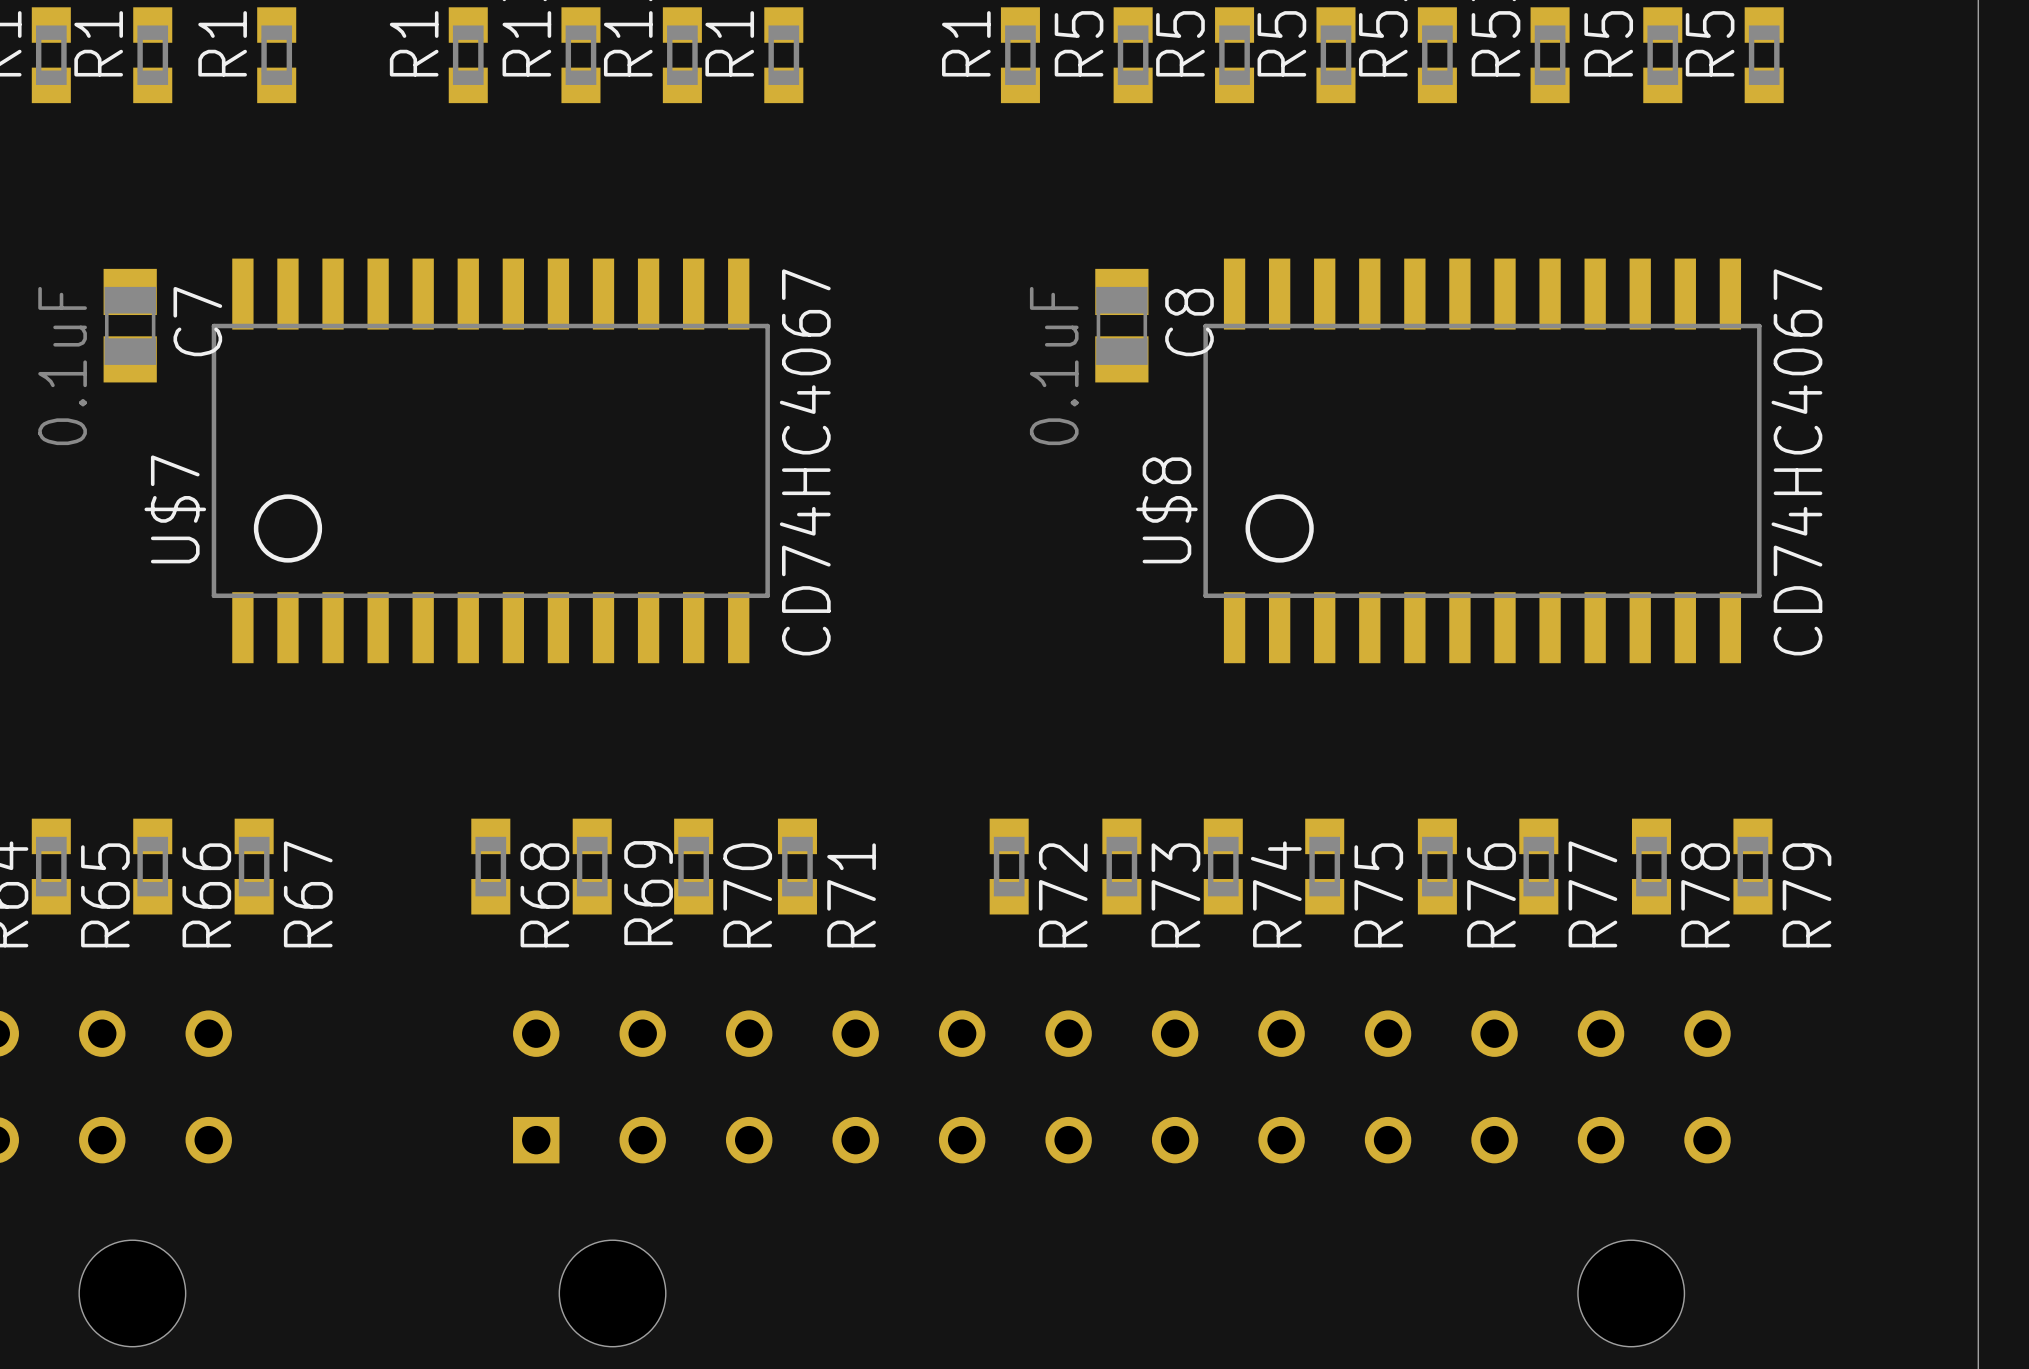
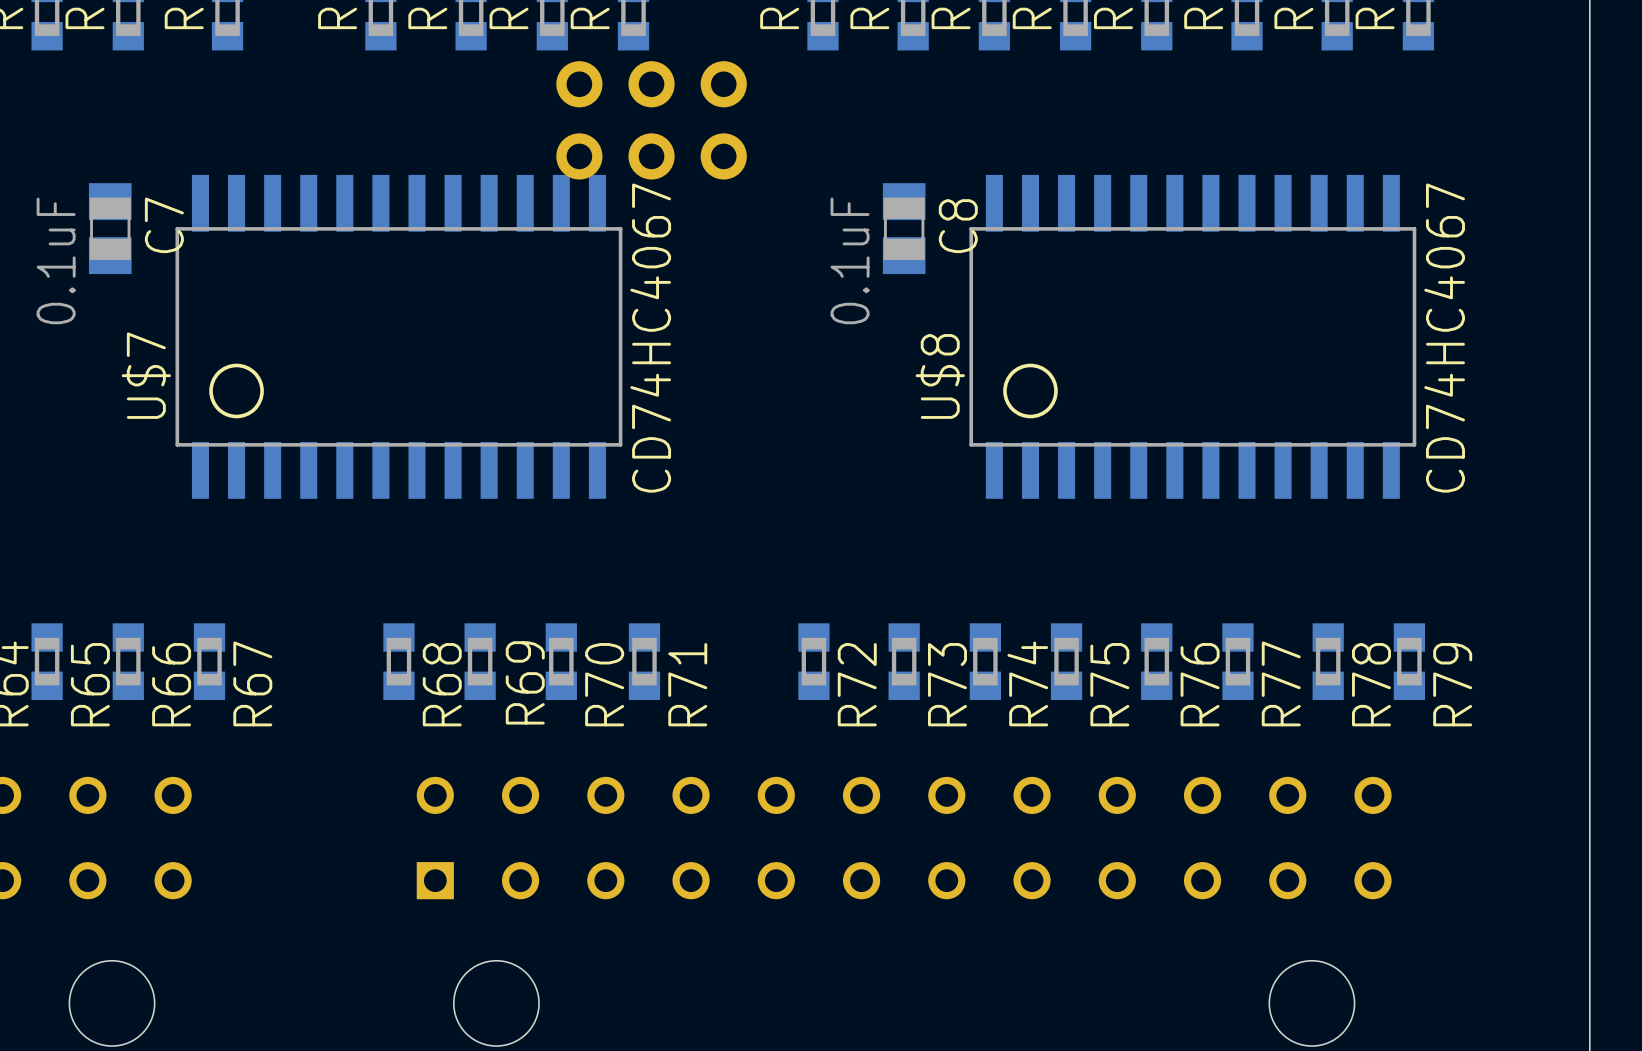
part: none -> (651, 120)

